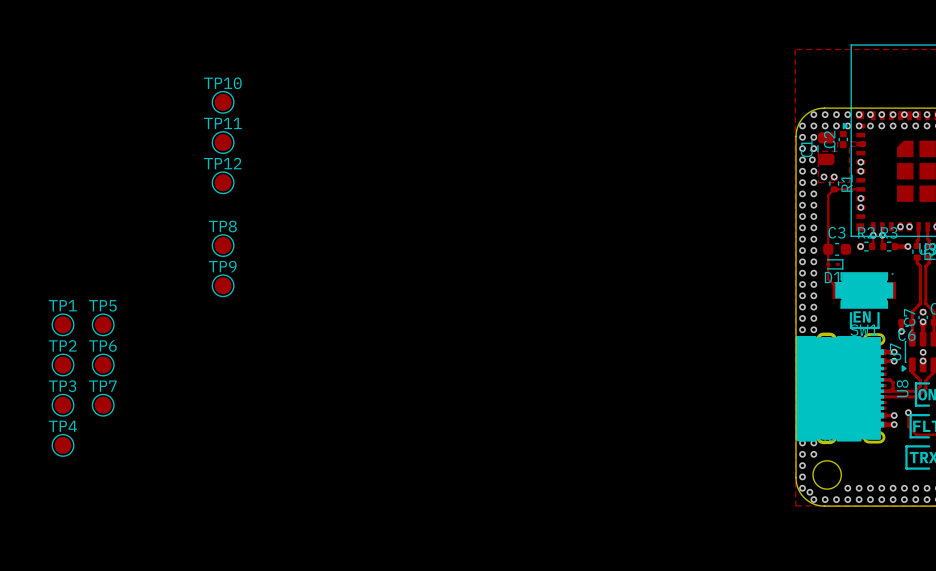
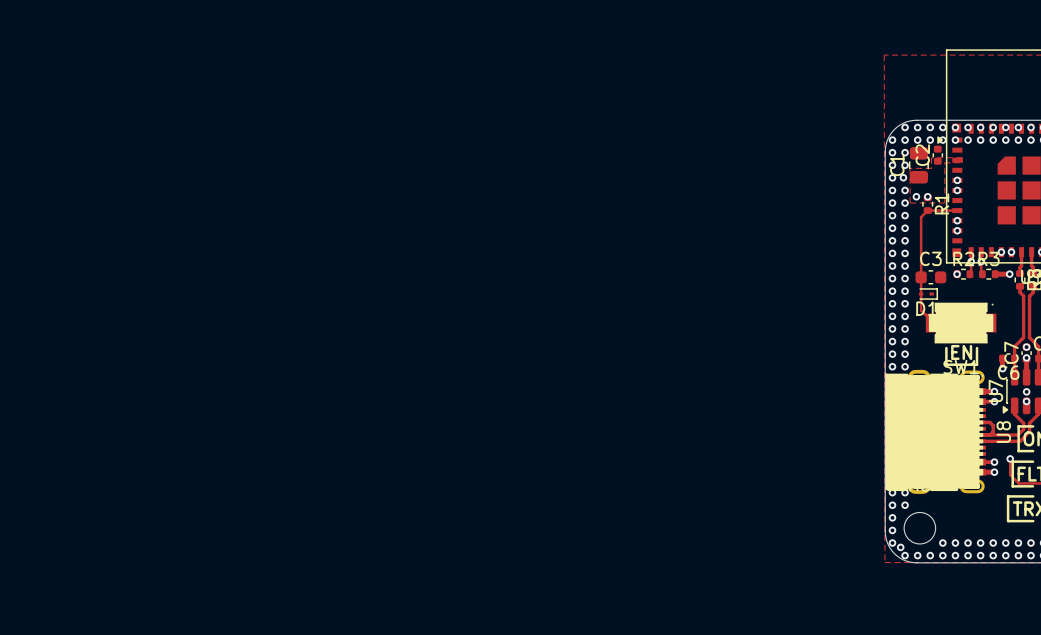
TP10: (223, 102) -> none
TP11: (223, 142) -> none
TP12: (223, 182) -> none
TP8: (223, 245) -> none
TP9: (223, 285) -> none
TP1: (63, 324) -> none
TP5: (103, 324) -> none
TP2: (63, 365) -> none
TP6: (103, 365) -> none
TP3: (63, 405) -> none
TP7: (103, 405) -> none
TP4: (63, 445) -> none

